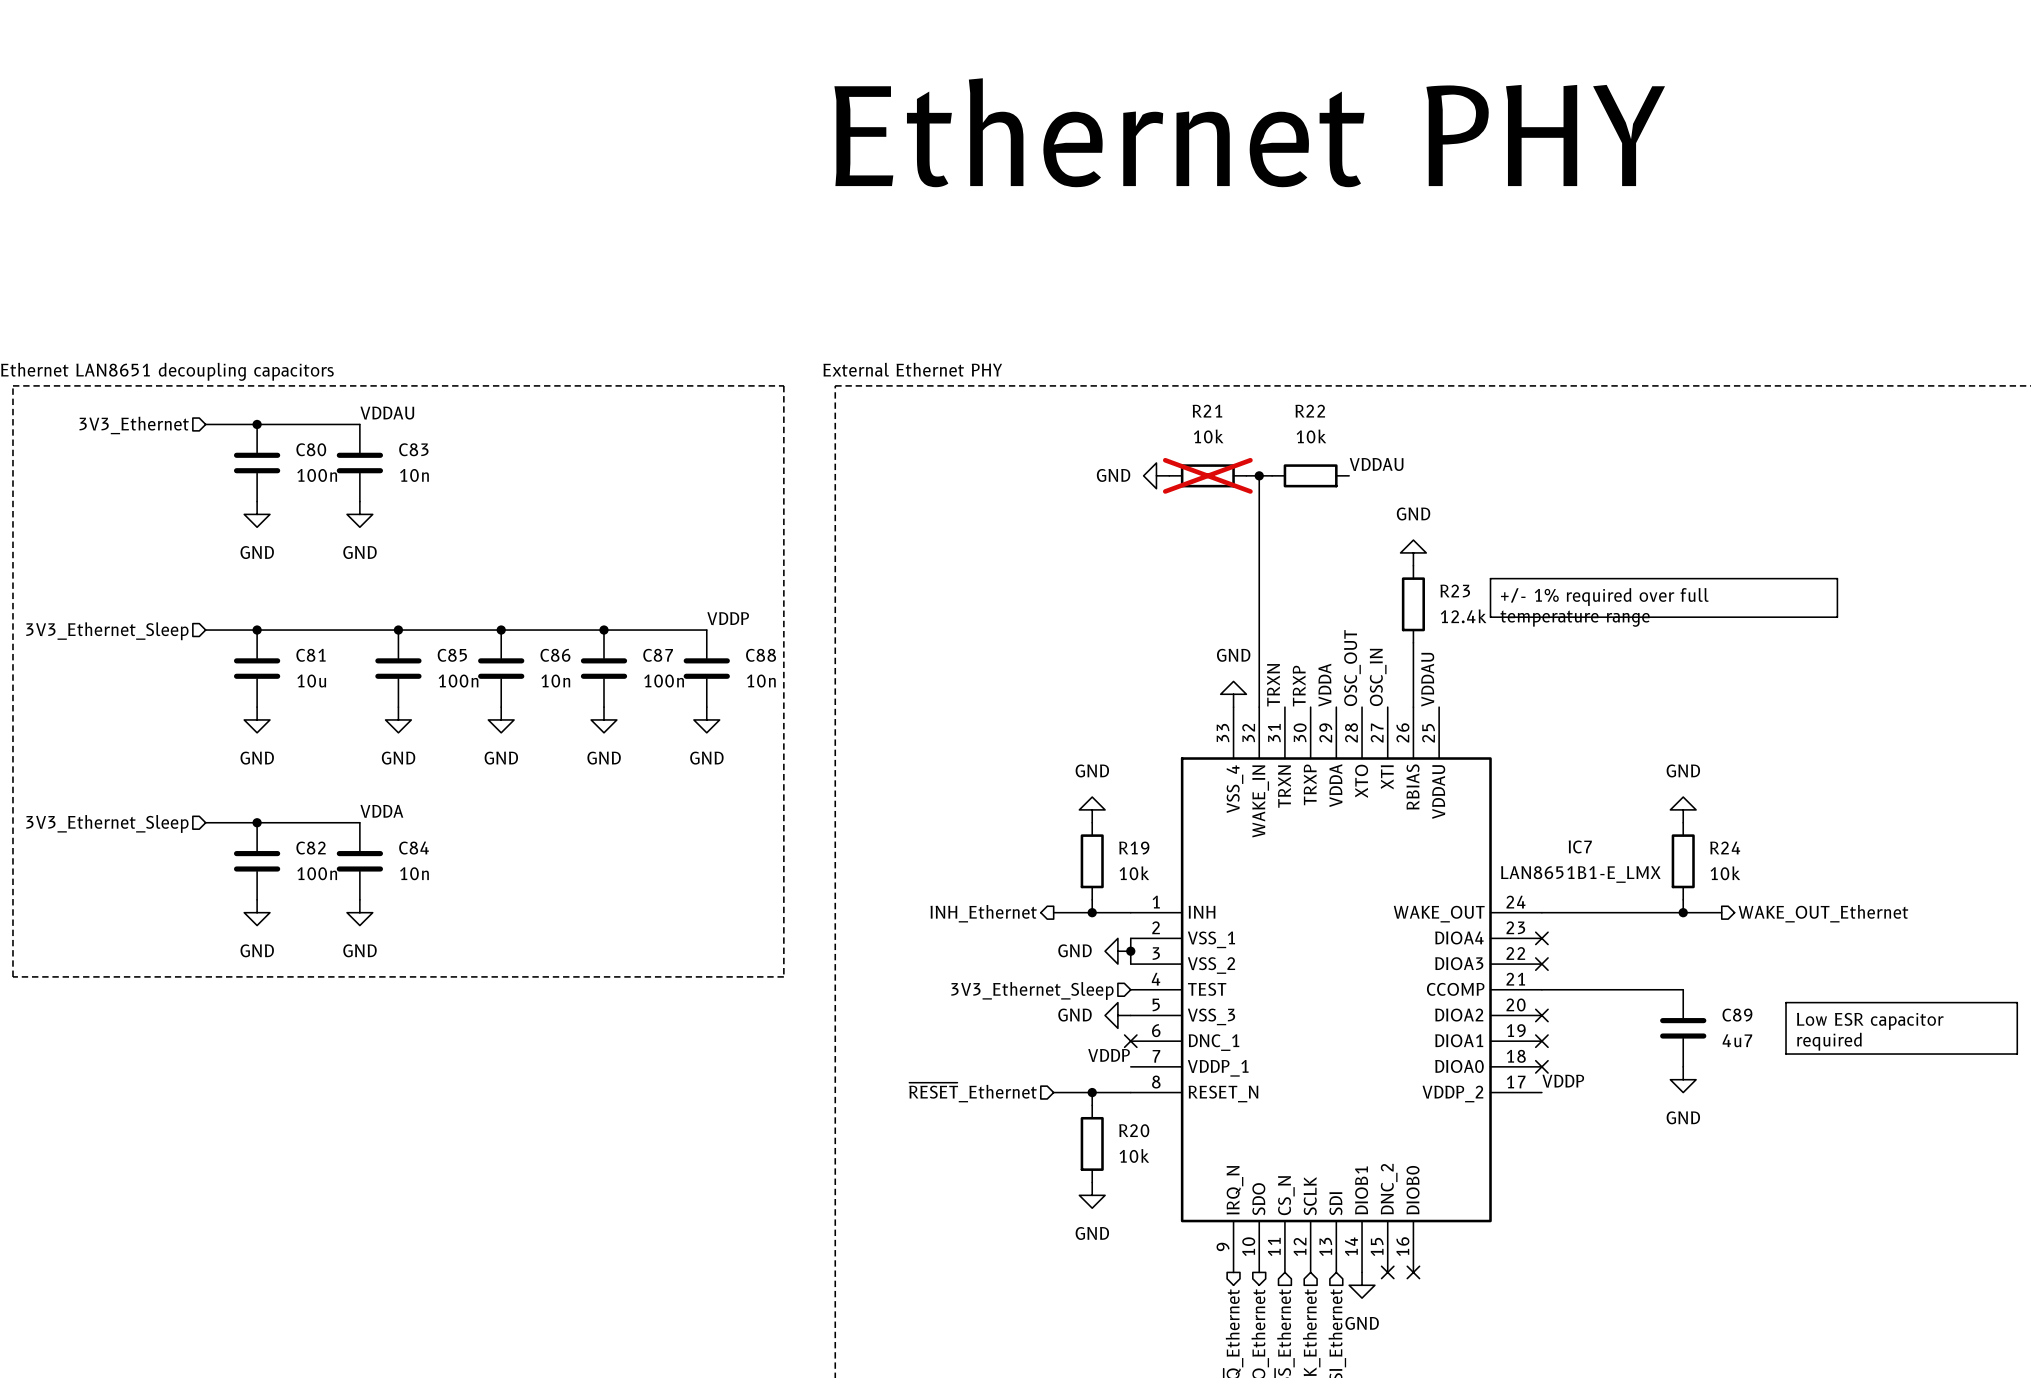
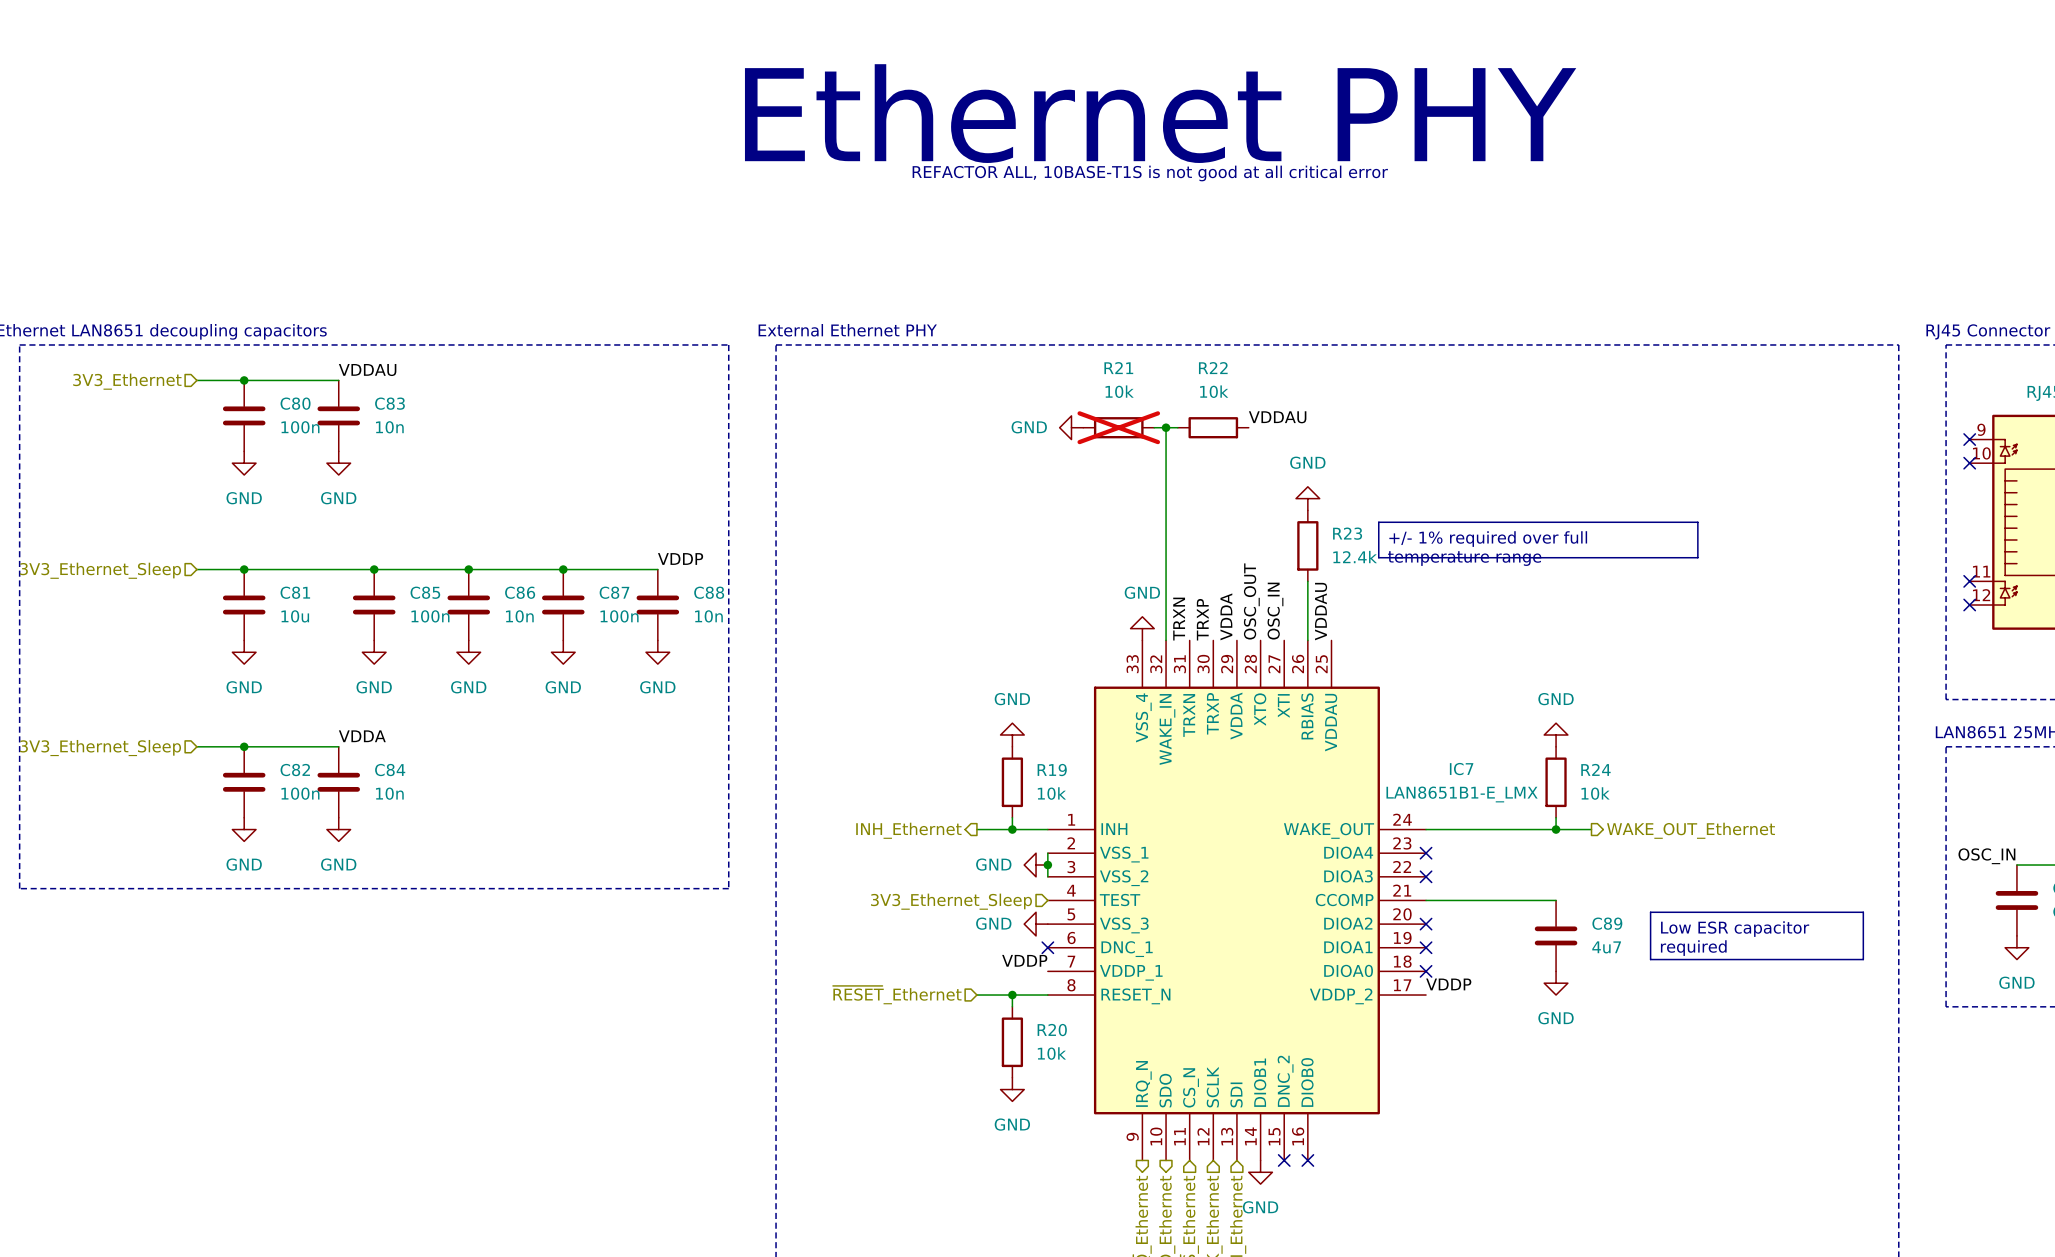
text: none -> REFACTOR ALL, 10BASE-T1S is not good at all critical error (1150, 173)

